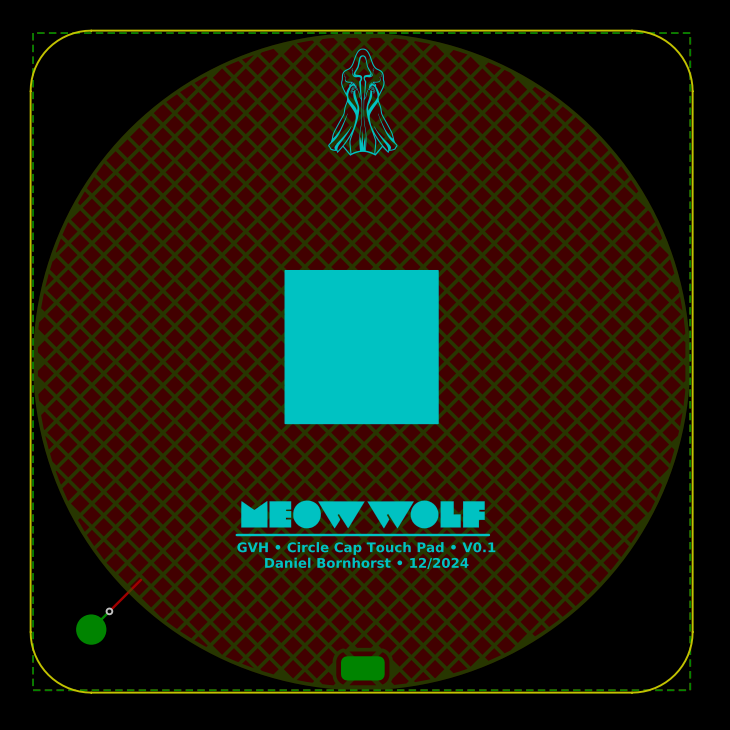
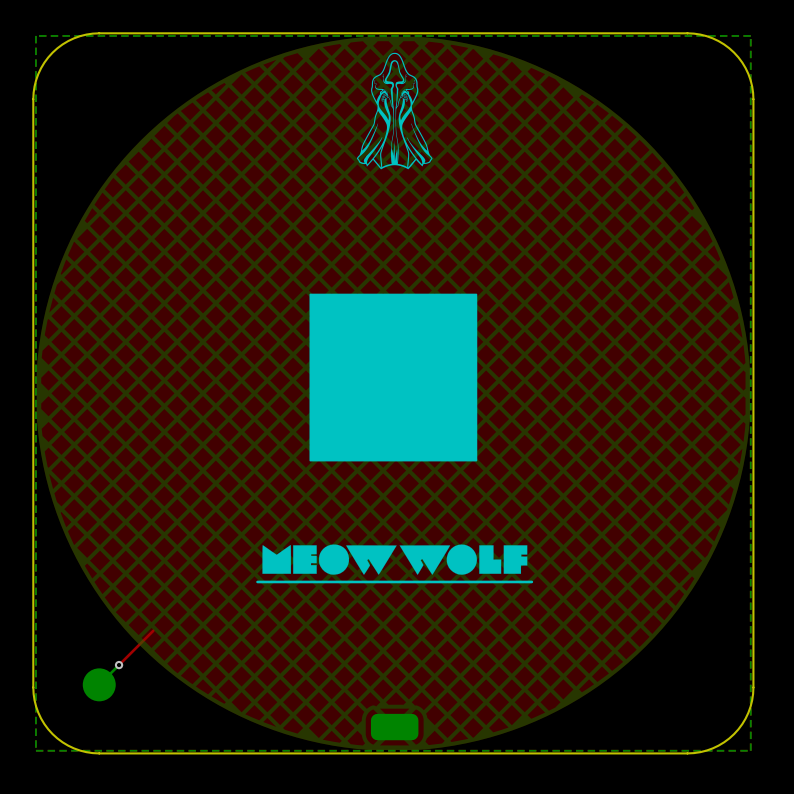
text: GVH • Circle Cap Touch Pad • V0.1 (366, 548) -> none
text: Daniel Bornhorst • 12/2024 (366, 563) -> none

